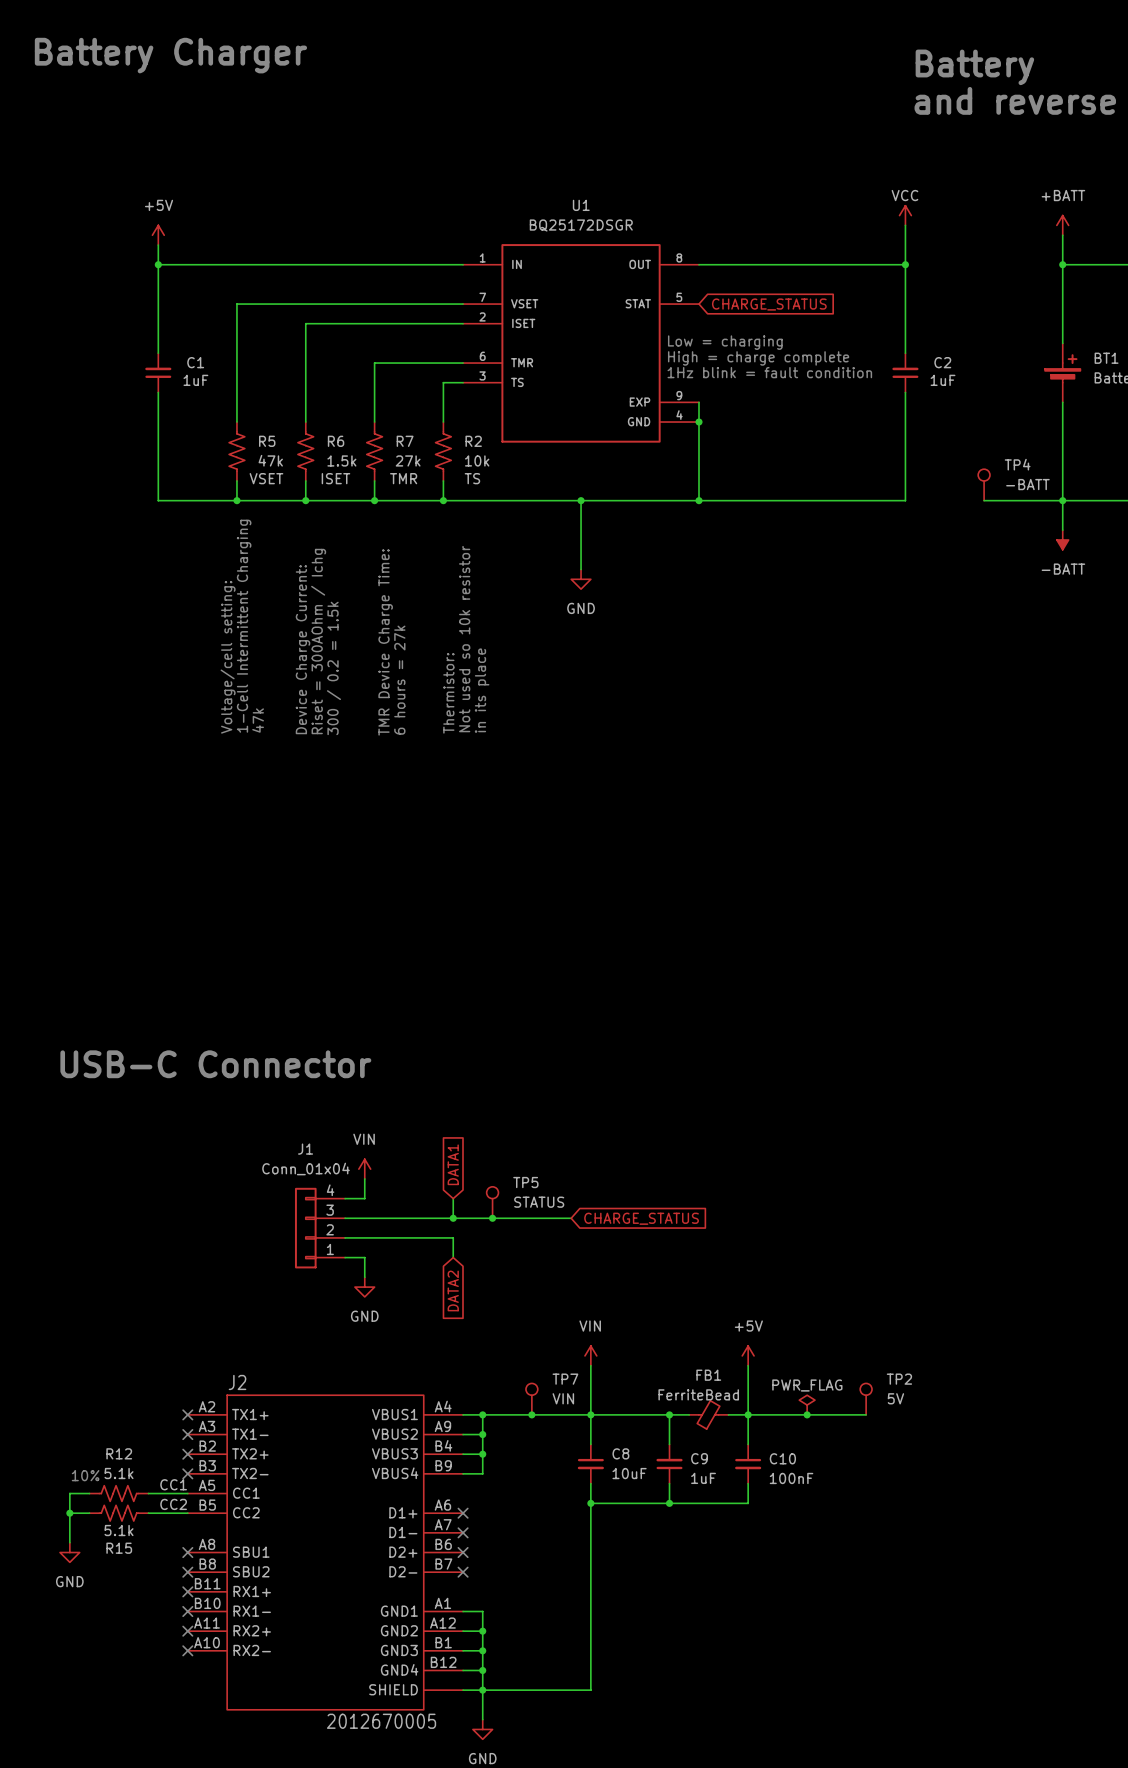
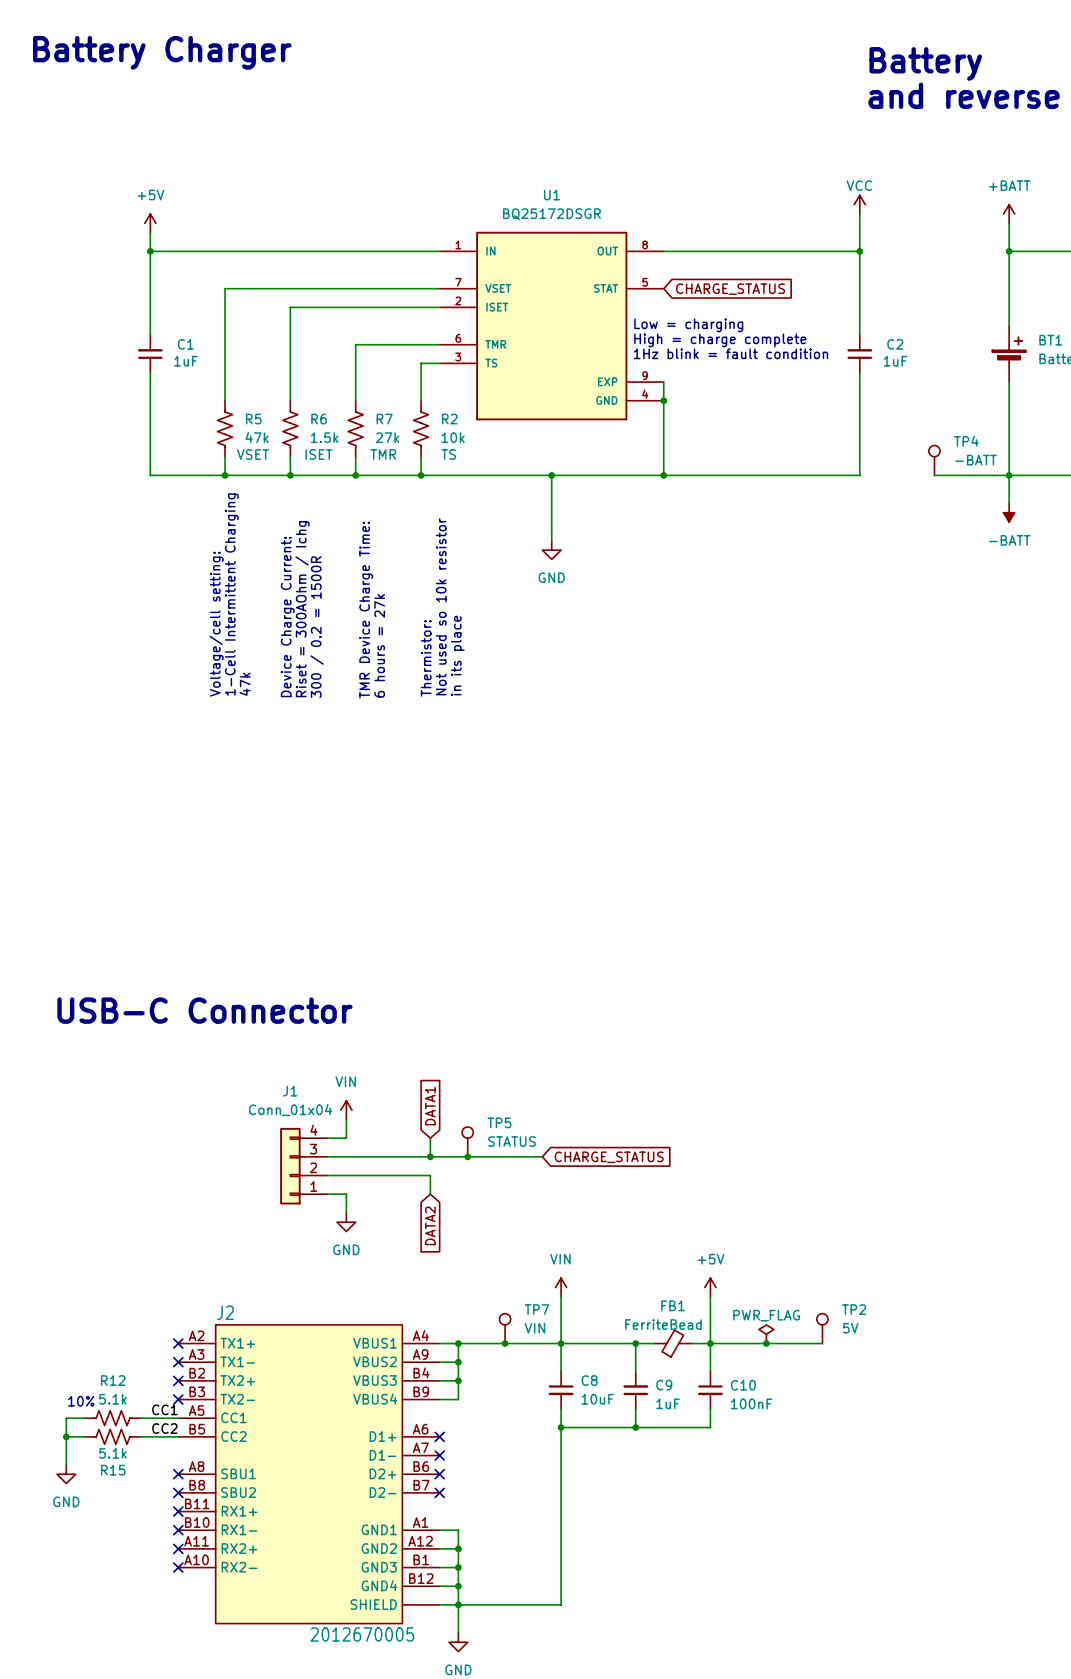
text: 300 / 0.2 = 1.5k (333, 668) -> 300 / 0.2 = 1500R (317, 627)

